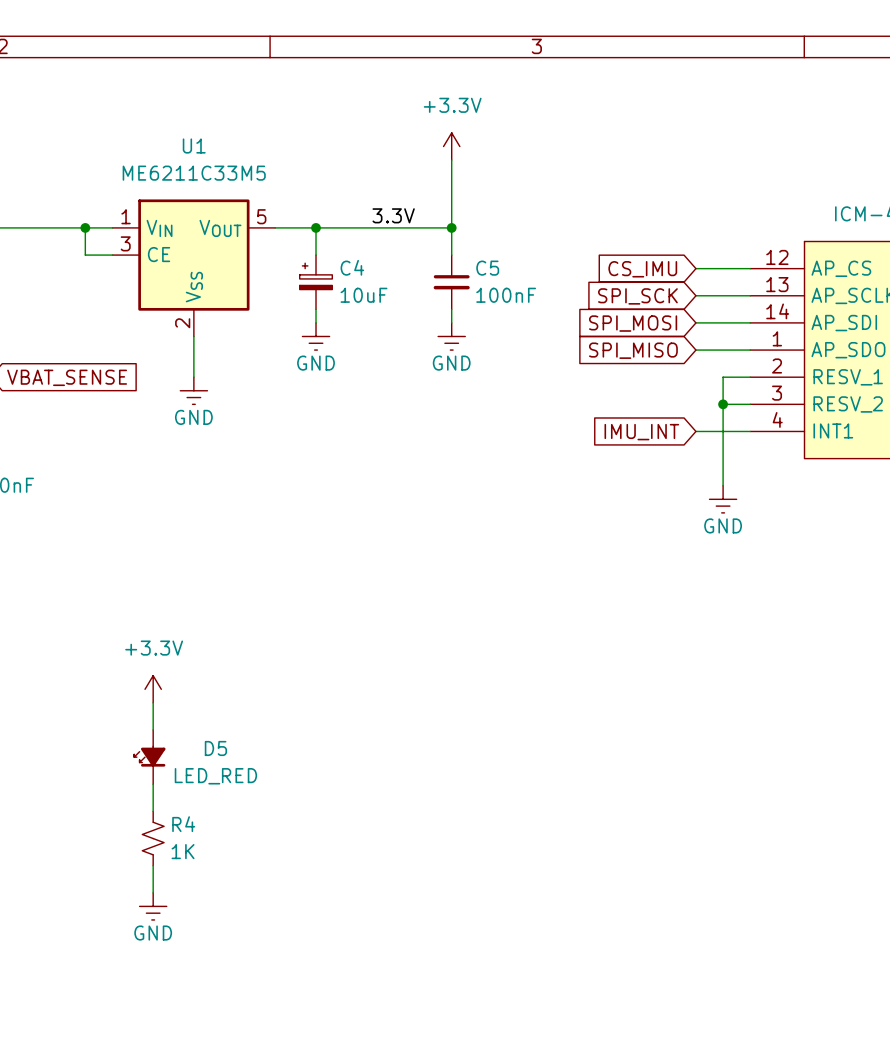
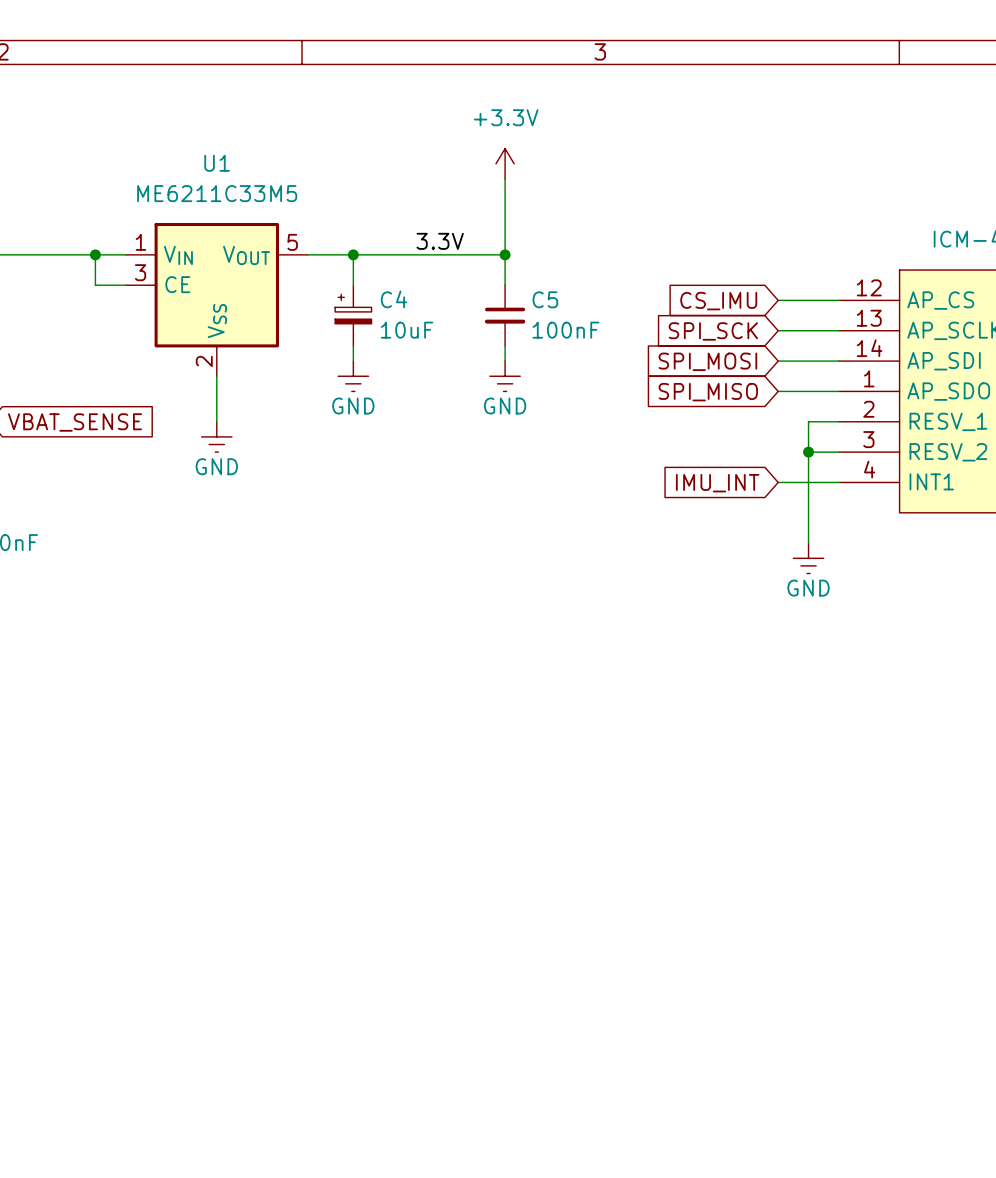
power symbol: +3.3V (153, 689) -> none
wire: (153, 702) (153, 729) -> none
D5: LED_RED (149, 757) -> none
wire: (153, 784) (153, 811) -> none
R4: 1K (153, 838) -> none
wire: (153, 865) (153, 892) -> none
power symbol: GND (153, 906) -> none

